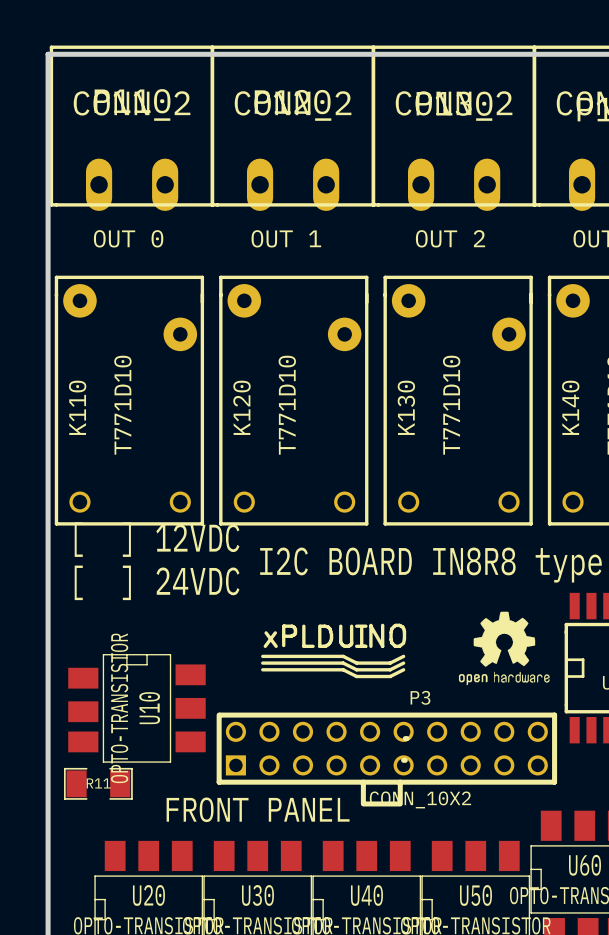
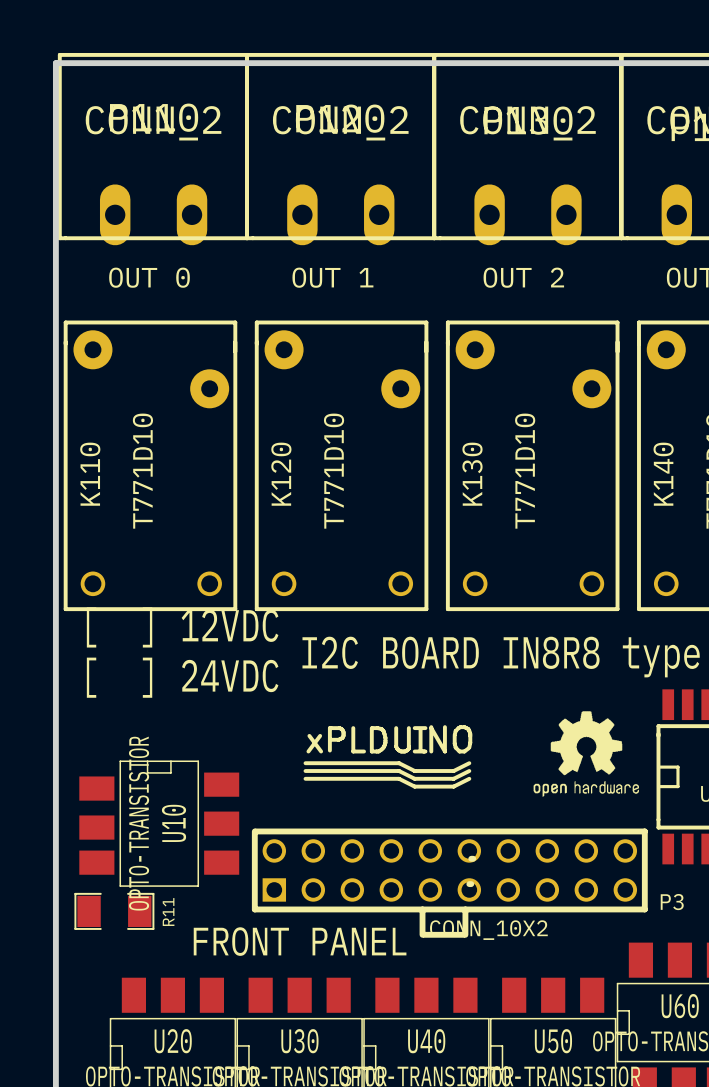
P3 name position: P3 (420, 697) -> P3 (672, 902)
R11 name rotation: 0° (98, 783) -> 90° counterclockwise (168, 912)
R11 name position: R11 (98, 783) -> R11 (168, 912)

